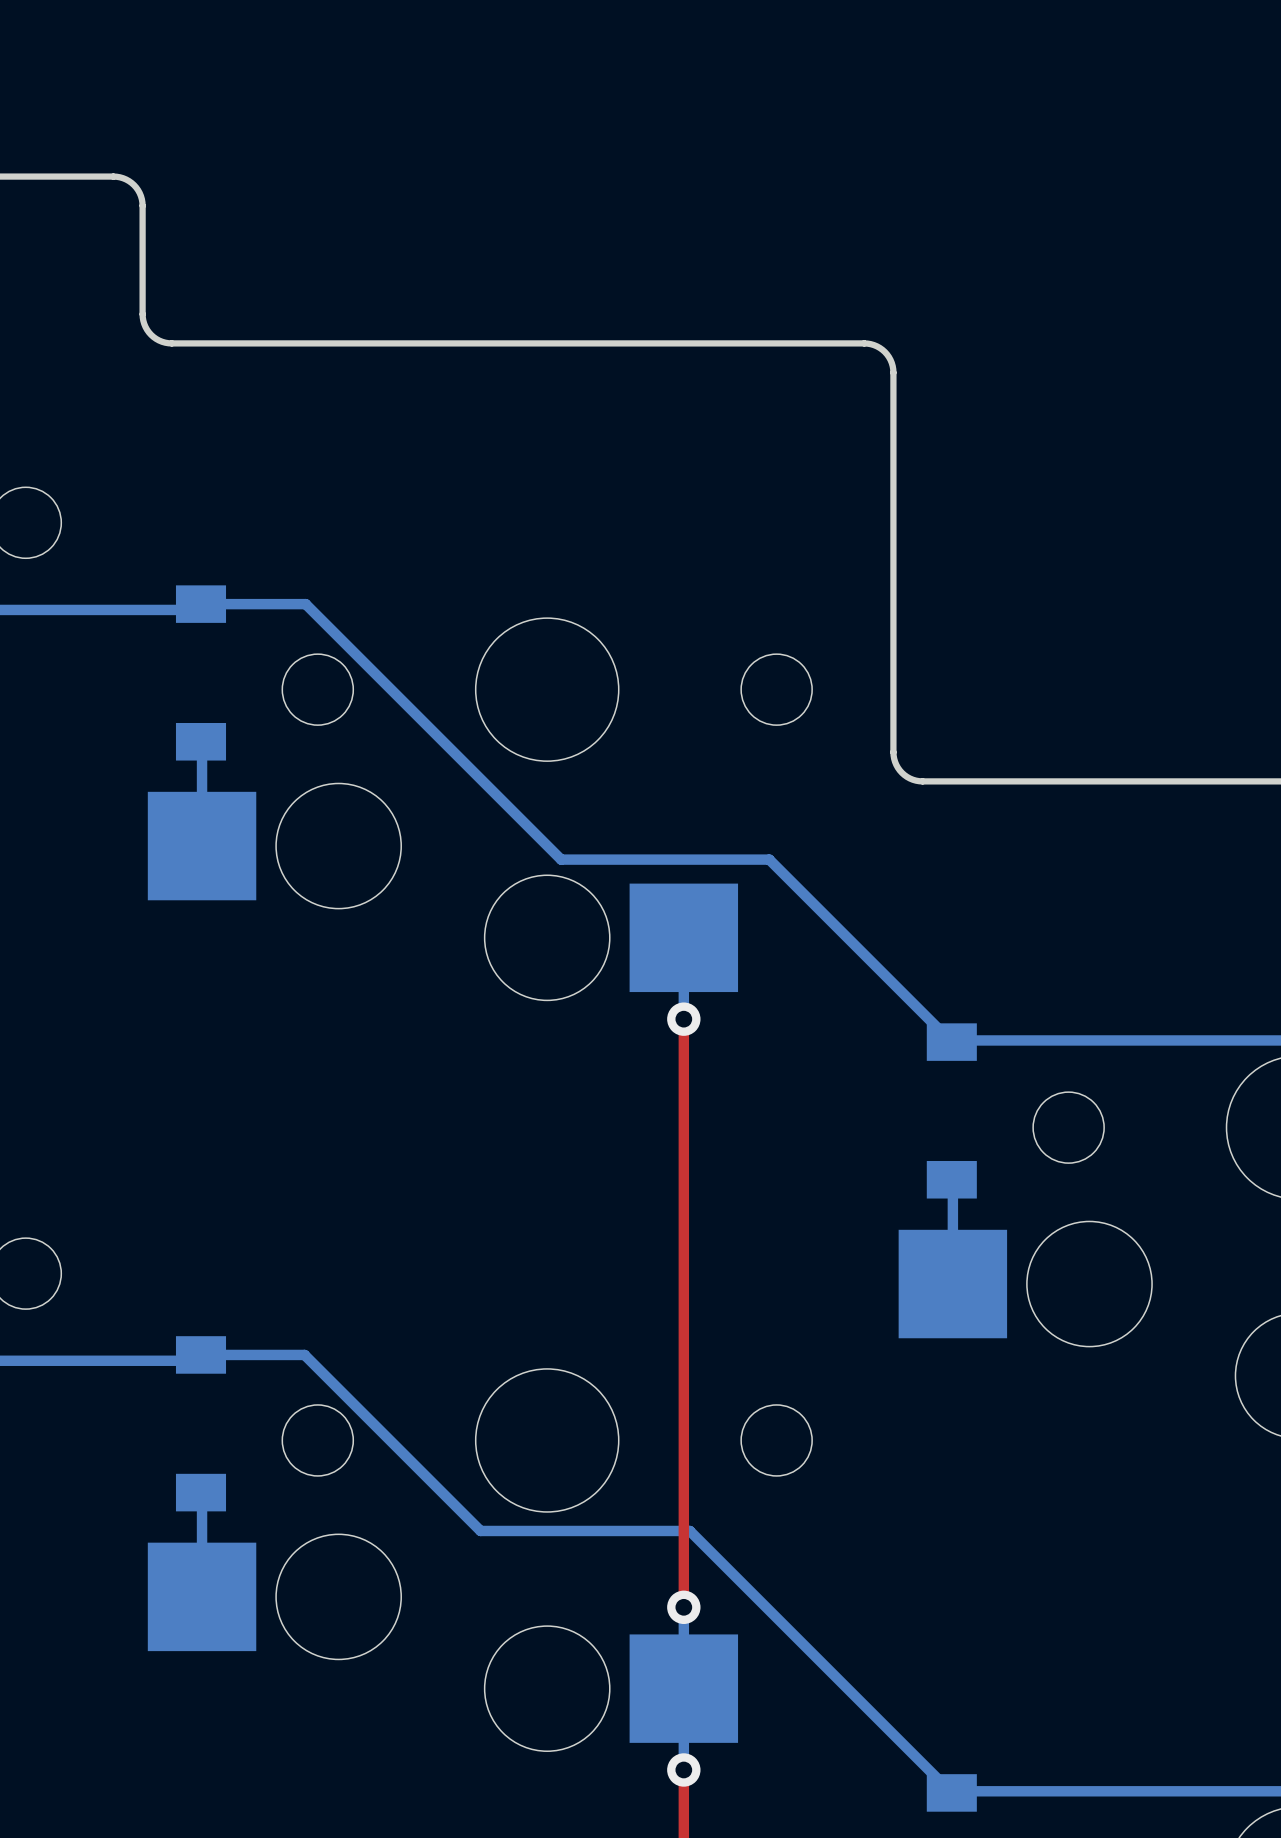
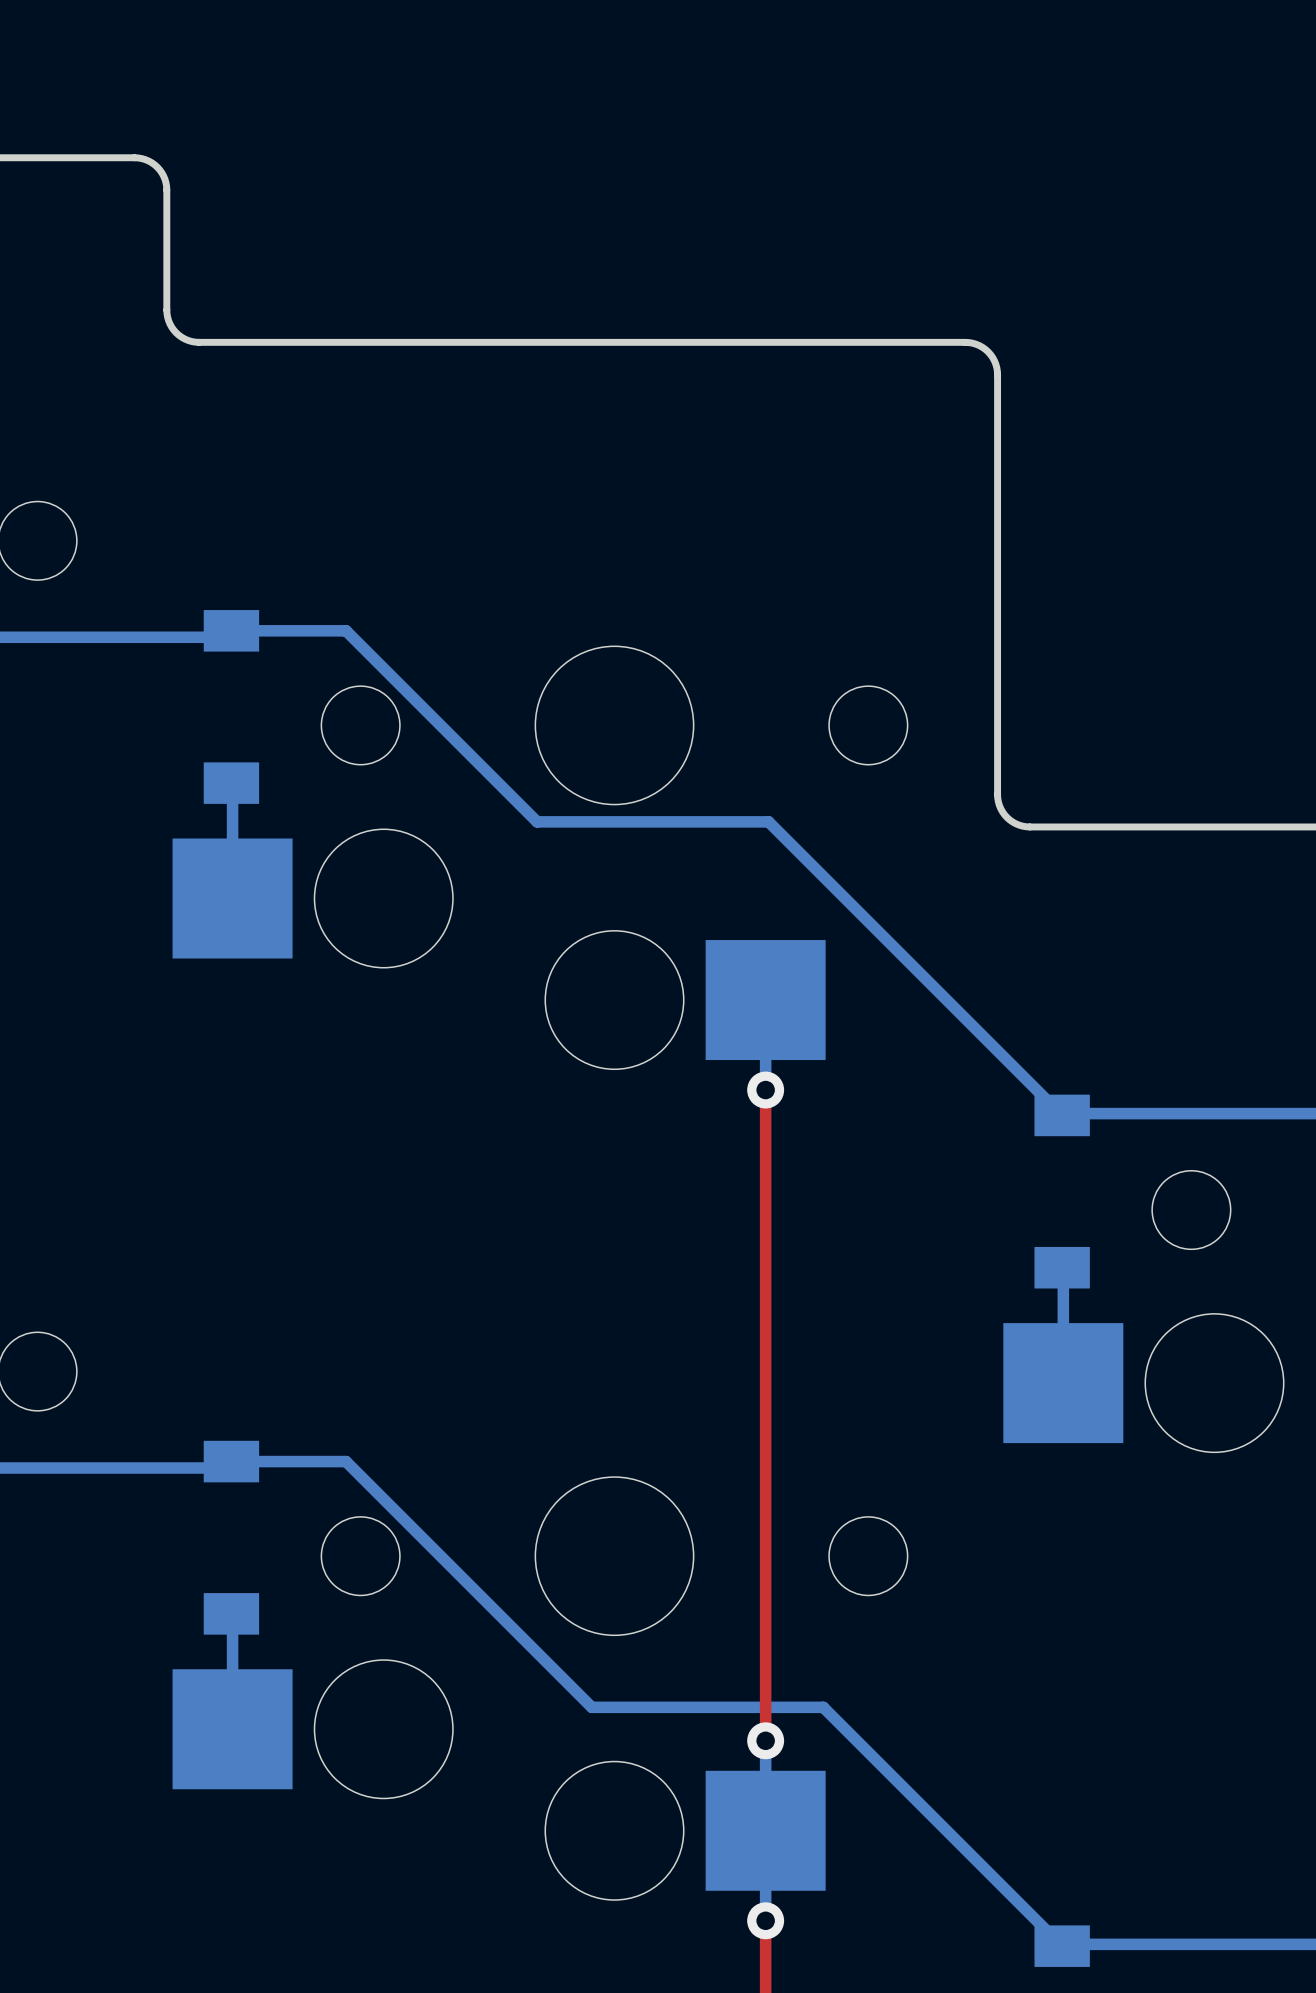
bottom track: (304, 604) (561, 859) (769, 859) -> (346, 630) (537, 821) (768, 821) (860, 913)
bottom track: (480, 1530) (689, 1530) (735, 1577) -> (540, 1656) (591, 1707) (823, 1707)

